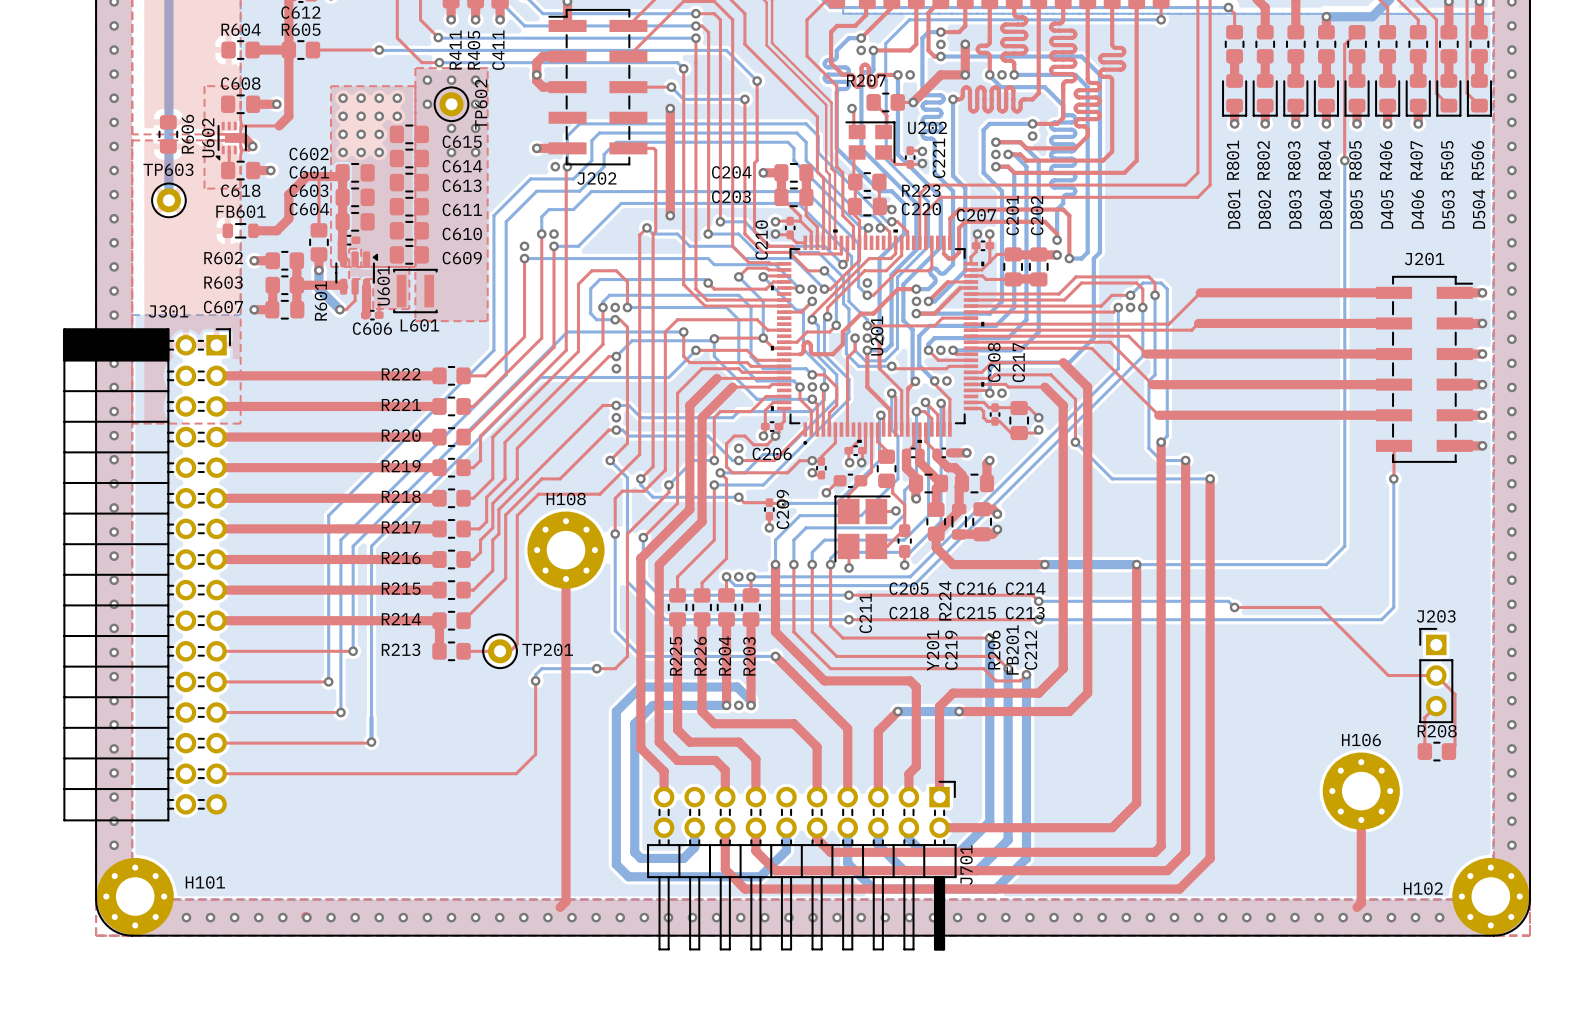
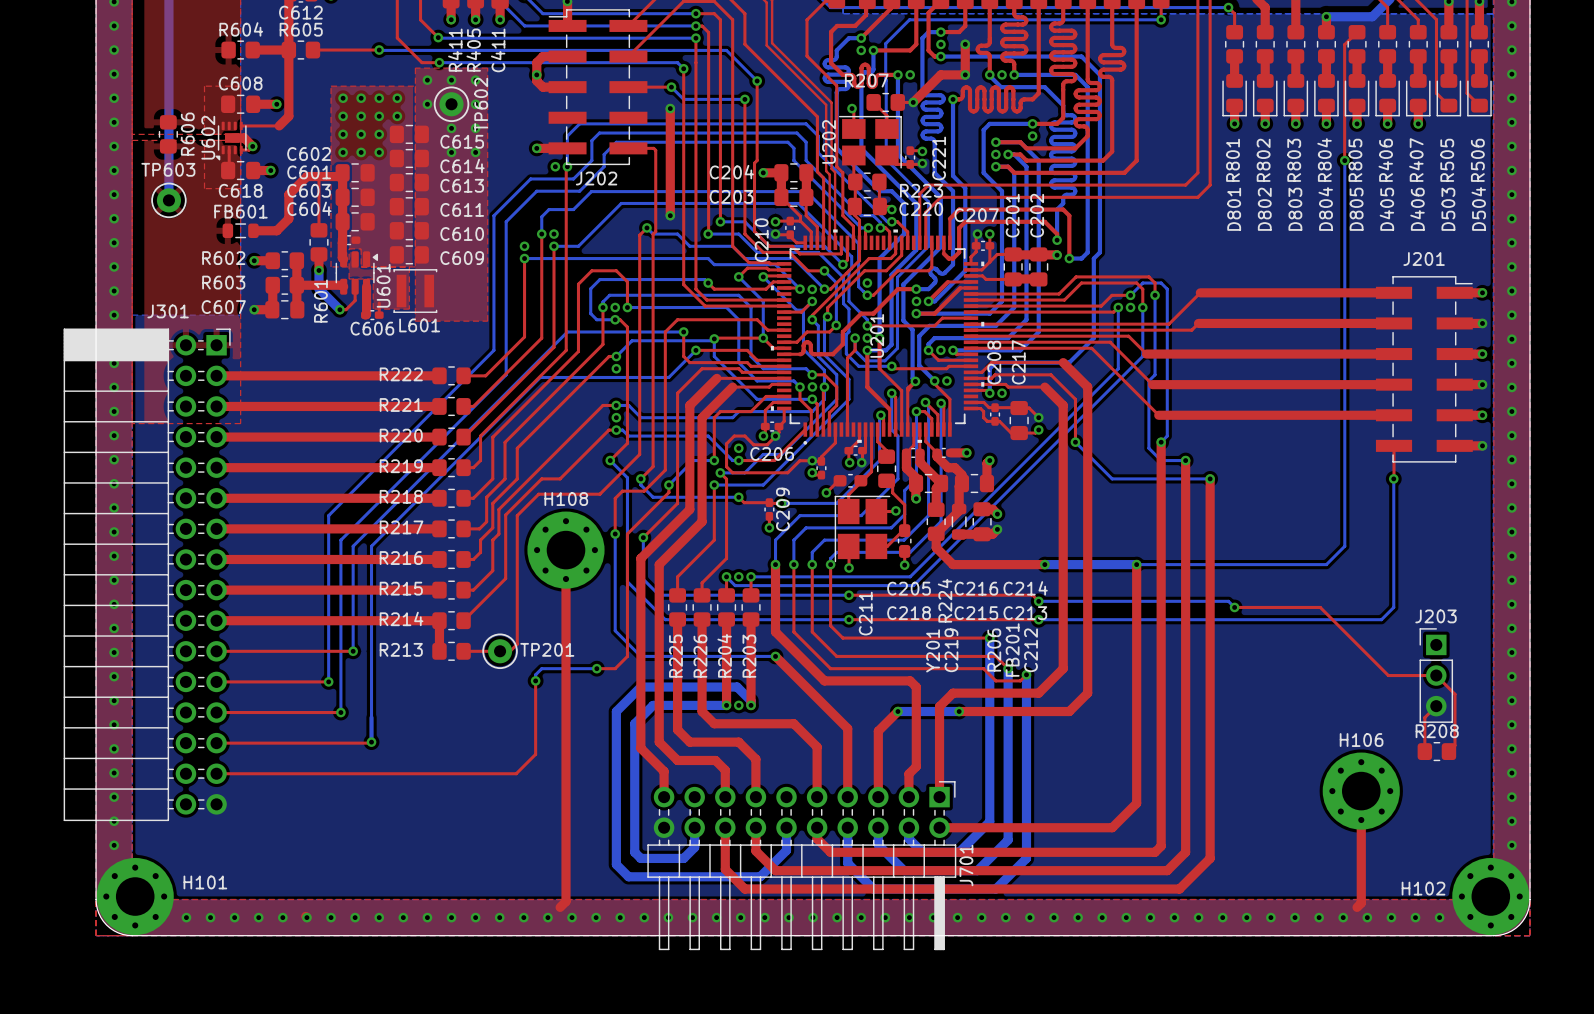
U202 footprint: [845, 121, 896, 163] -> [838, 115, 902, 169]
U202 name rotation: 0° (927, 127) -> 90° counterclockwise (829, 141)
U202 name position: U202 (927, 127) -> U202 (829, 141)

